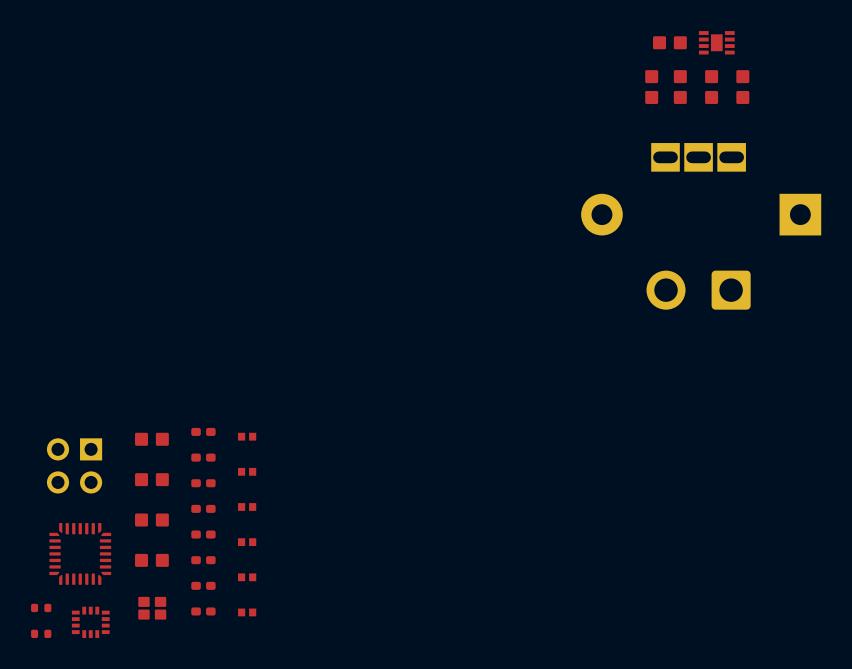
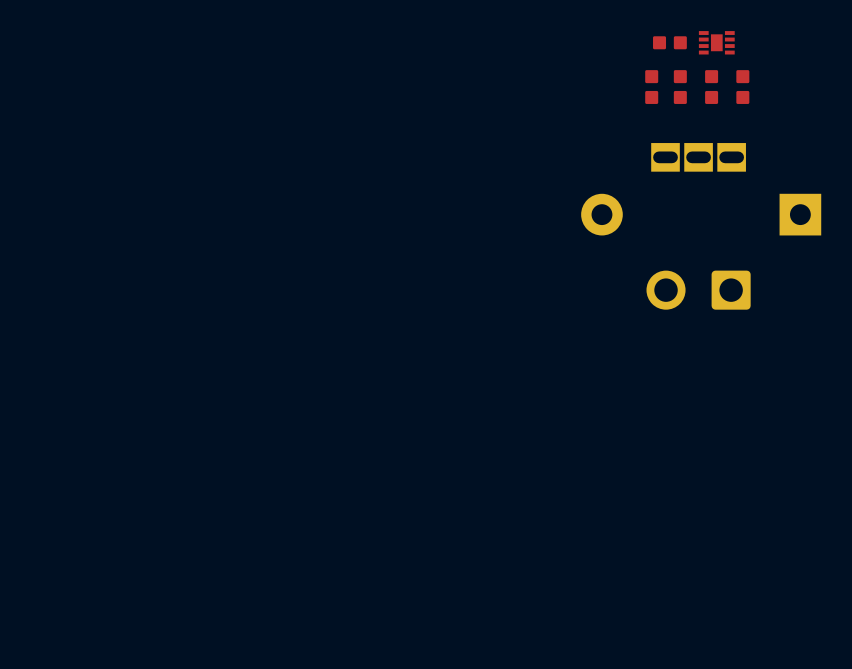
part: (203, 431) -> none
part: (247, 436) -> none
part: (151, 439) -> none
part: (203, 457) -> none
part: (74, 465) -> none
part: (247, 471) -> none
part: (151, 479) -> none
part: (203, 483) -> none
part: (247, 506) -> none
part: (203, 508) -> none
part: (151, 520) -> none
part: (203, 534) -> none
part: (247, 542) -> none
part: (80, 553) -> none
part: (151, 560) -> none
part: (203, 560) -> none
part: (247, 577) -> none
part: (203, 585) -> none
part: (41, 607) -> none
part: (152, 608) -> none
part: (203, 611) -> none
part: (247, 612) -> none
part: (90, 622) -> none
part: (41, 633) -> none

